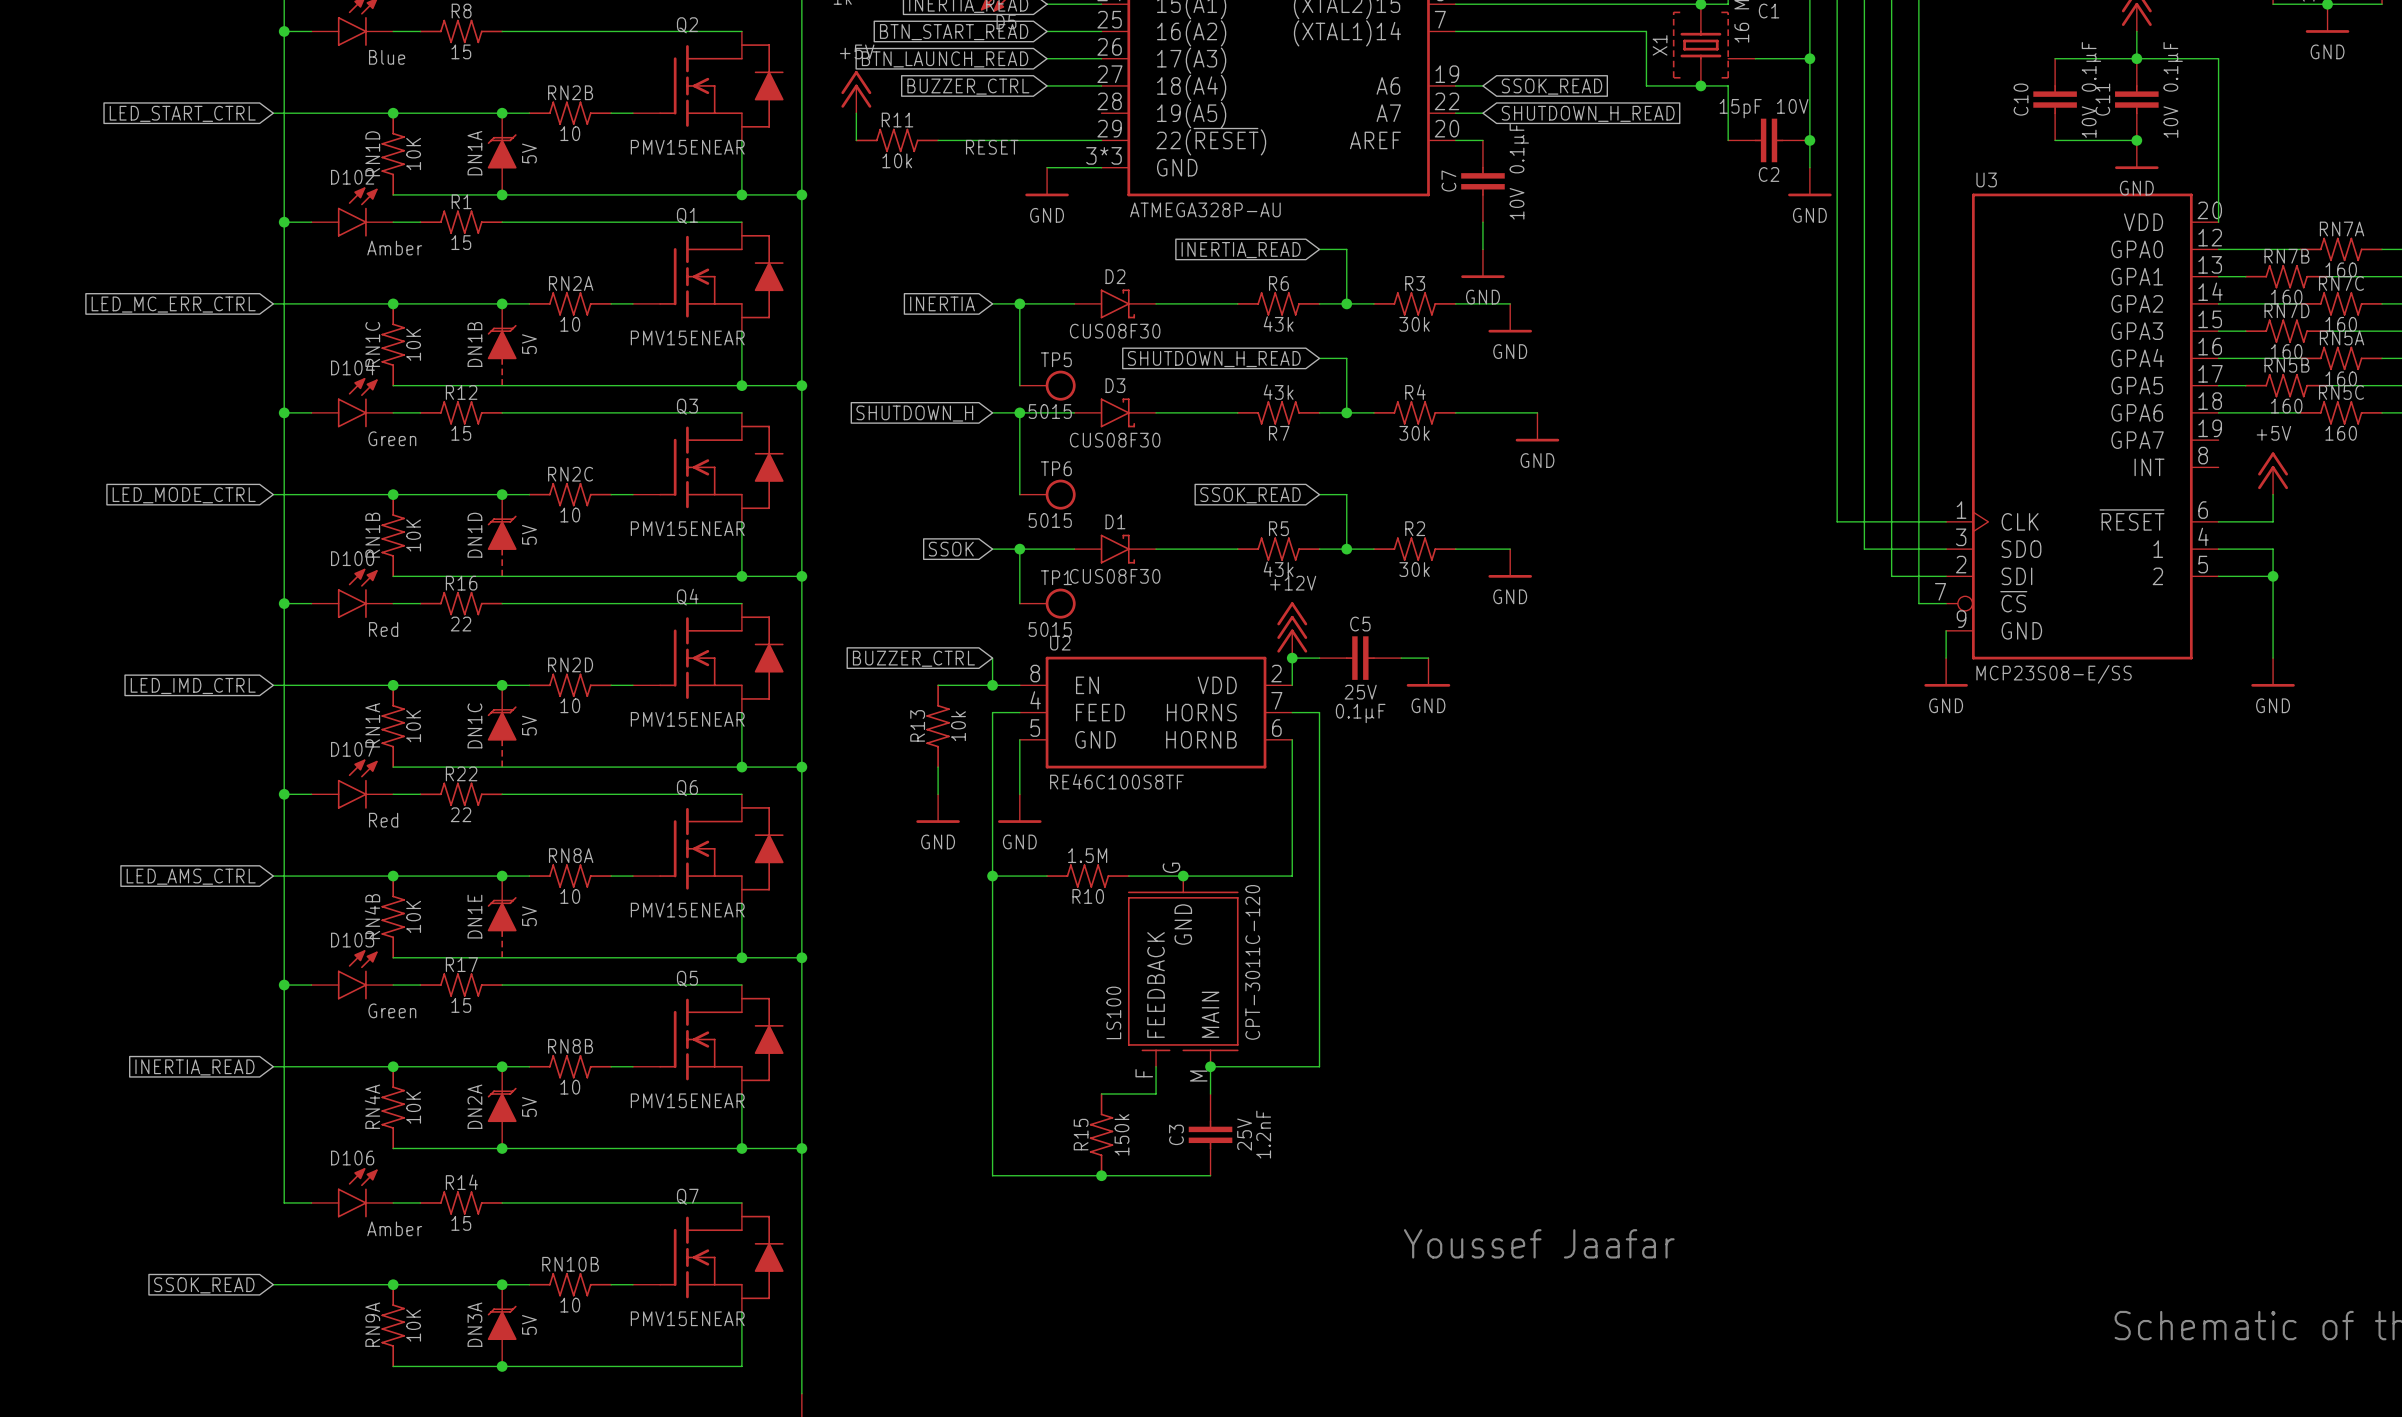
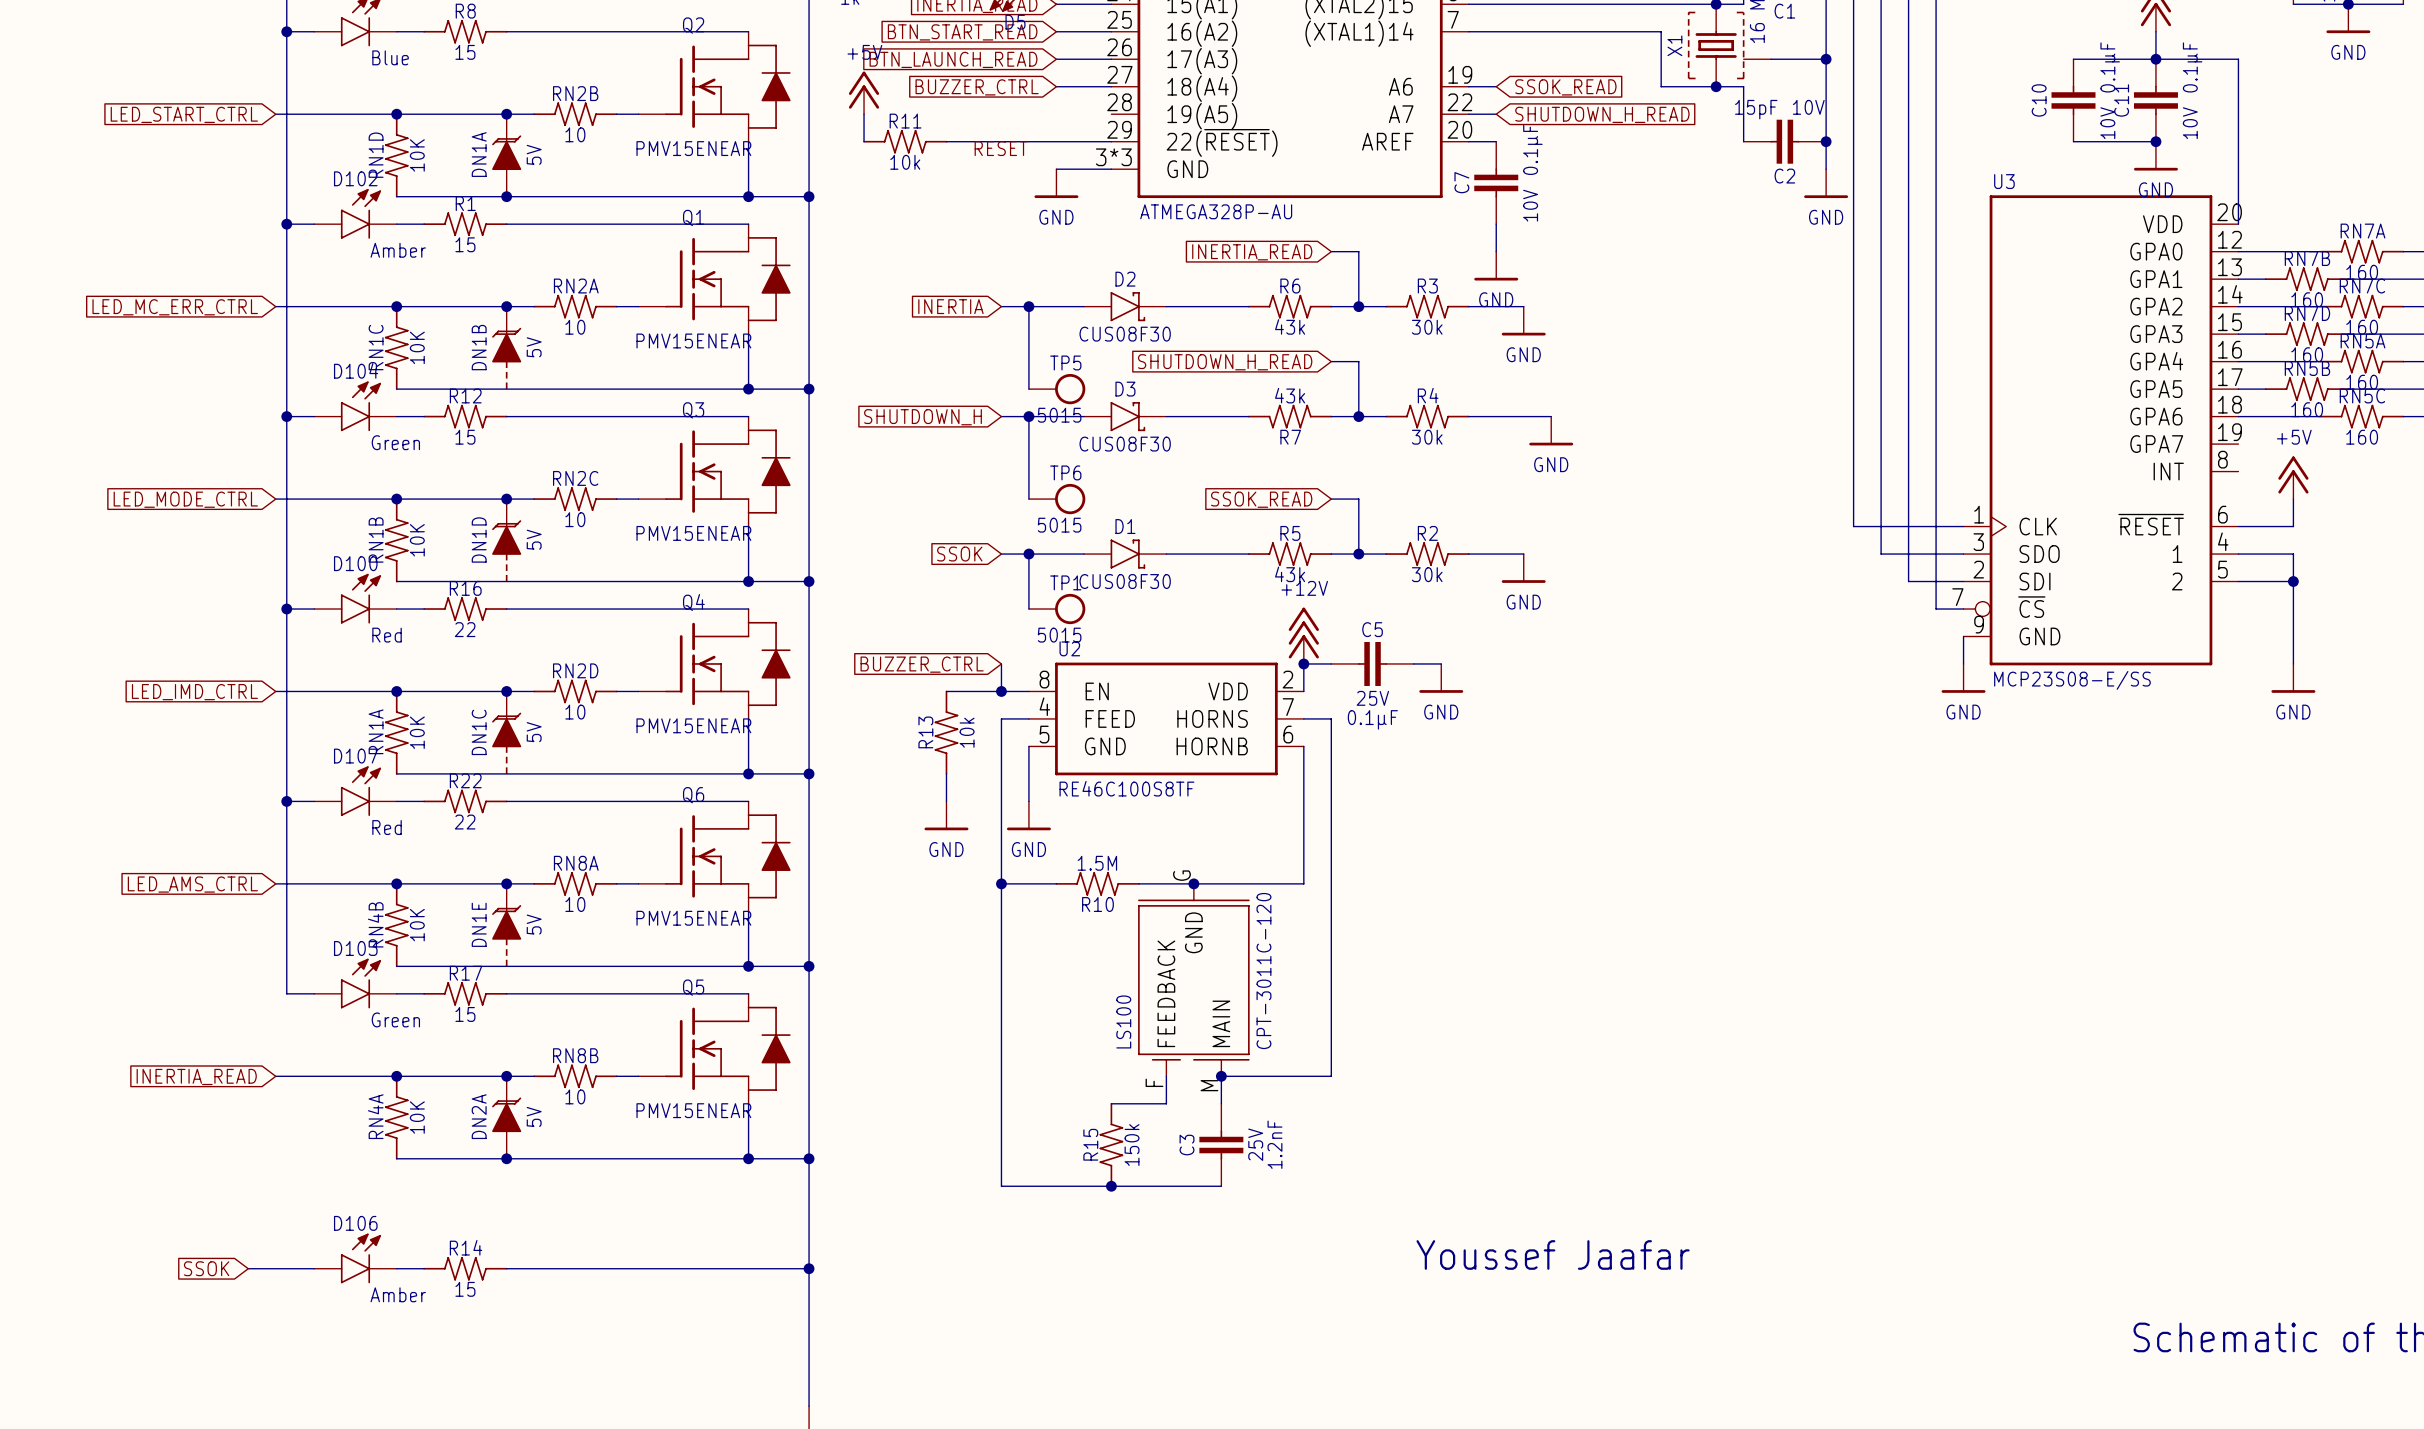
wire: (284, 985) (284, 1202) (311, 1202) -> none
junction: (284, 985) -> none
D106 position: (352, 1192) -> (355, 1258)
wire: (393, 1202) (420, 1202) -> (396, 1268) (424, 1268)
R14 position: (461, 1202) -> (465, 1268)
wire: (502, 1202) (741, 1202) -> none
wire: none -> (248, 1268) (314, 1268)
wire: none -> (506, 1268) (809, 1268)
Q7: (708, 1257) -> none
junction: none -> (809, 1268)
wire: (273, 1284) (529, 1284) -> none
junction: (393, 1284) -> none
junction: (502, 1284) -> none
RN10B: (570, 1284) -> none
wire: (611, 1284) (632, 1284) -> none
global label: SSOK_READ (204, 1285) -> SSOK (206, 1268)
wire: (741, 1311) (741, 1366) (393, 1366) -> none
RN9A: (393, 1325) -> none
DN3A: (502, 1325) -> none
junction: (502, 1366) -> none

